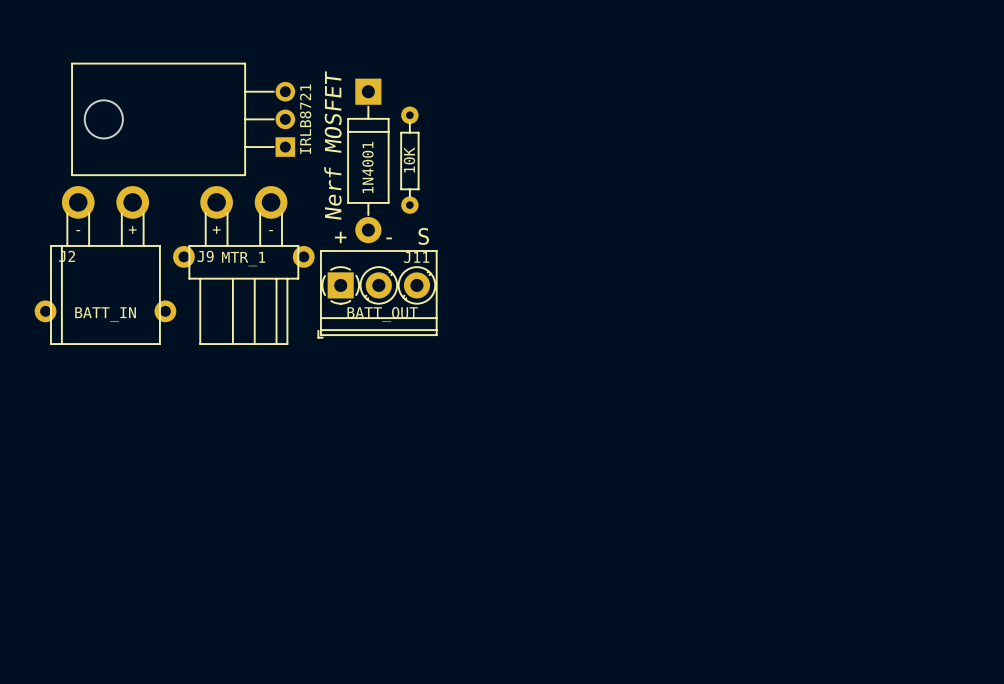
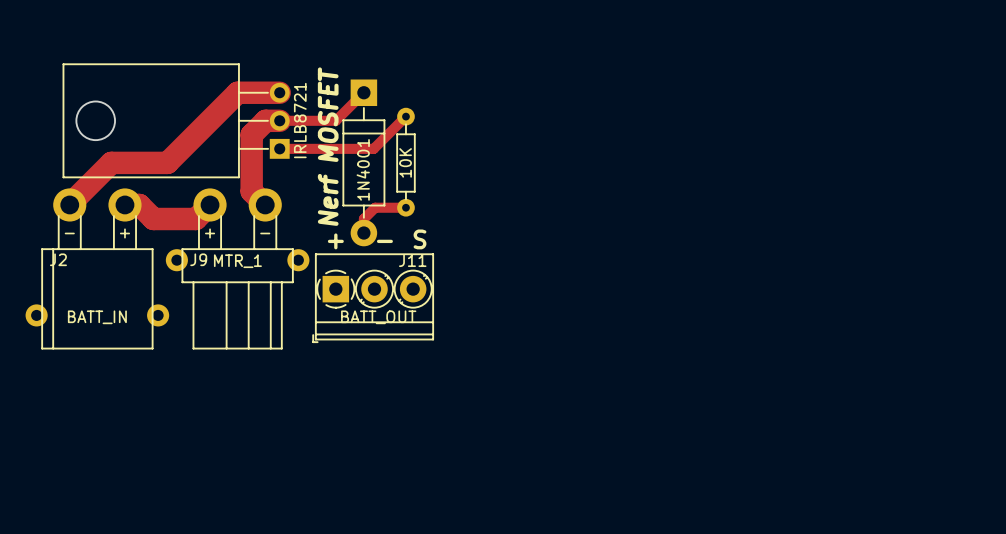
track: none -> (279, 92) (237, 92) (167, 162) (111, 162) (69, 204)
track: none -> (363, 92) (335, 120) (265, 120) (251, 134) (251, 191) (265, 204)
track: none -> (405, 116) (373, 148) (279, 148)
track: none -> (124, 204) (139, 204) (153, 219) (196, 219) (210, 204)
track: none -> (405, 207) (375, 207) (363, 219) (363, 233)

